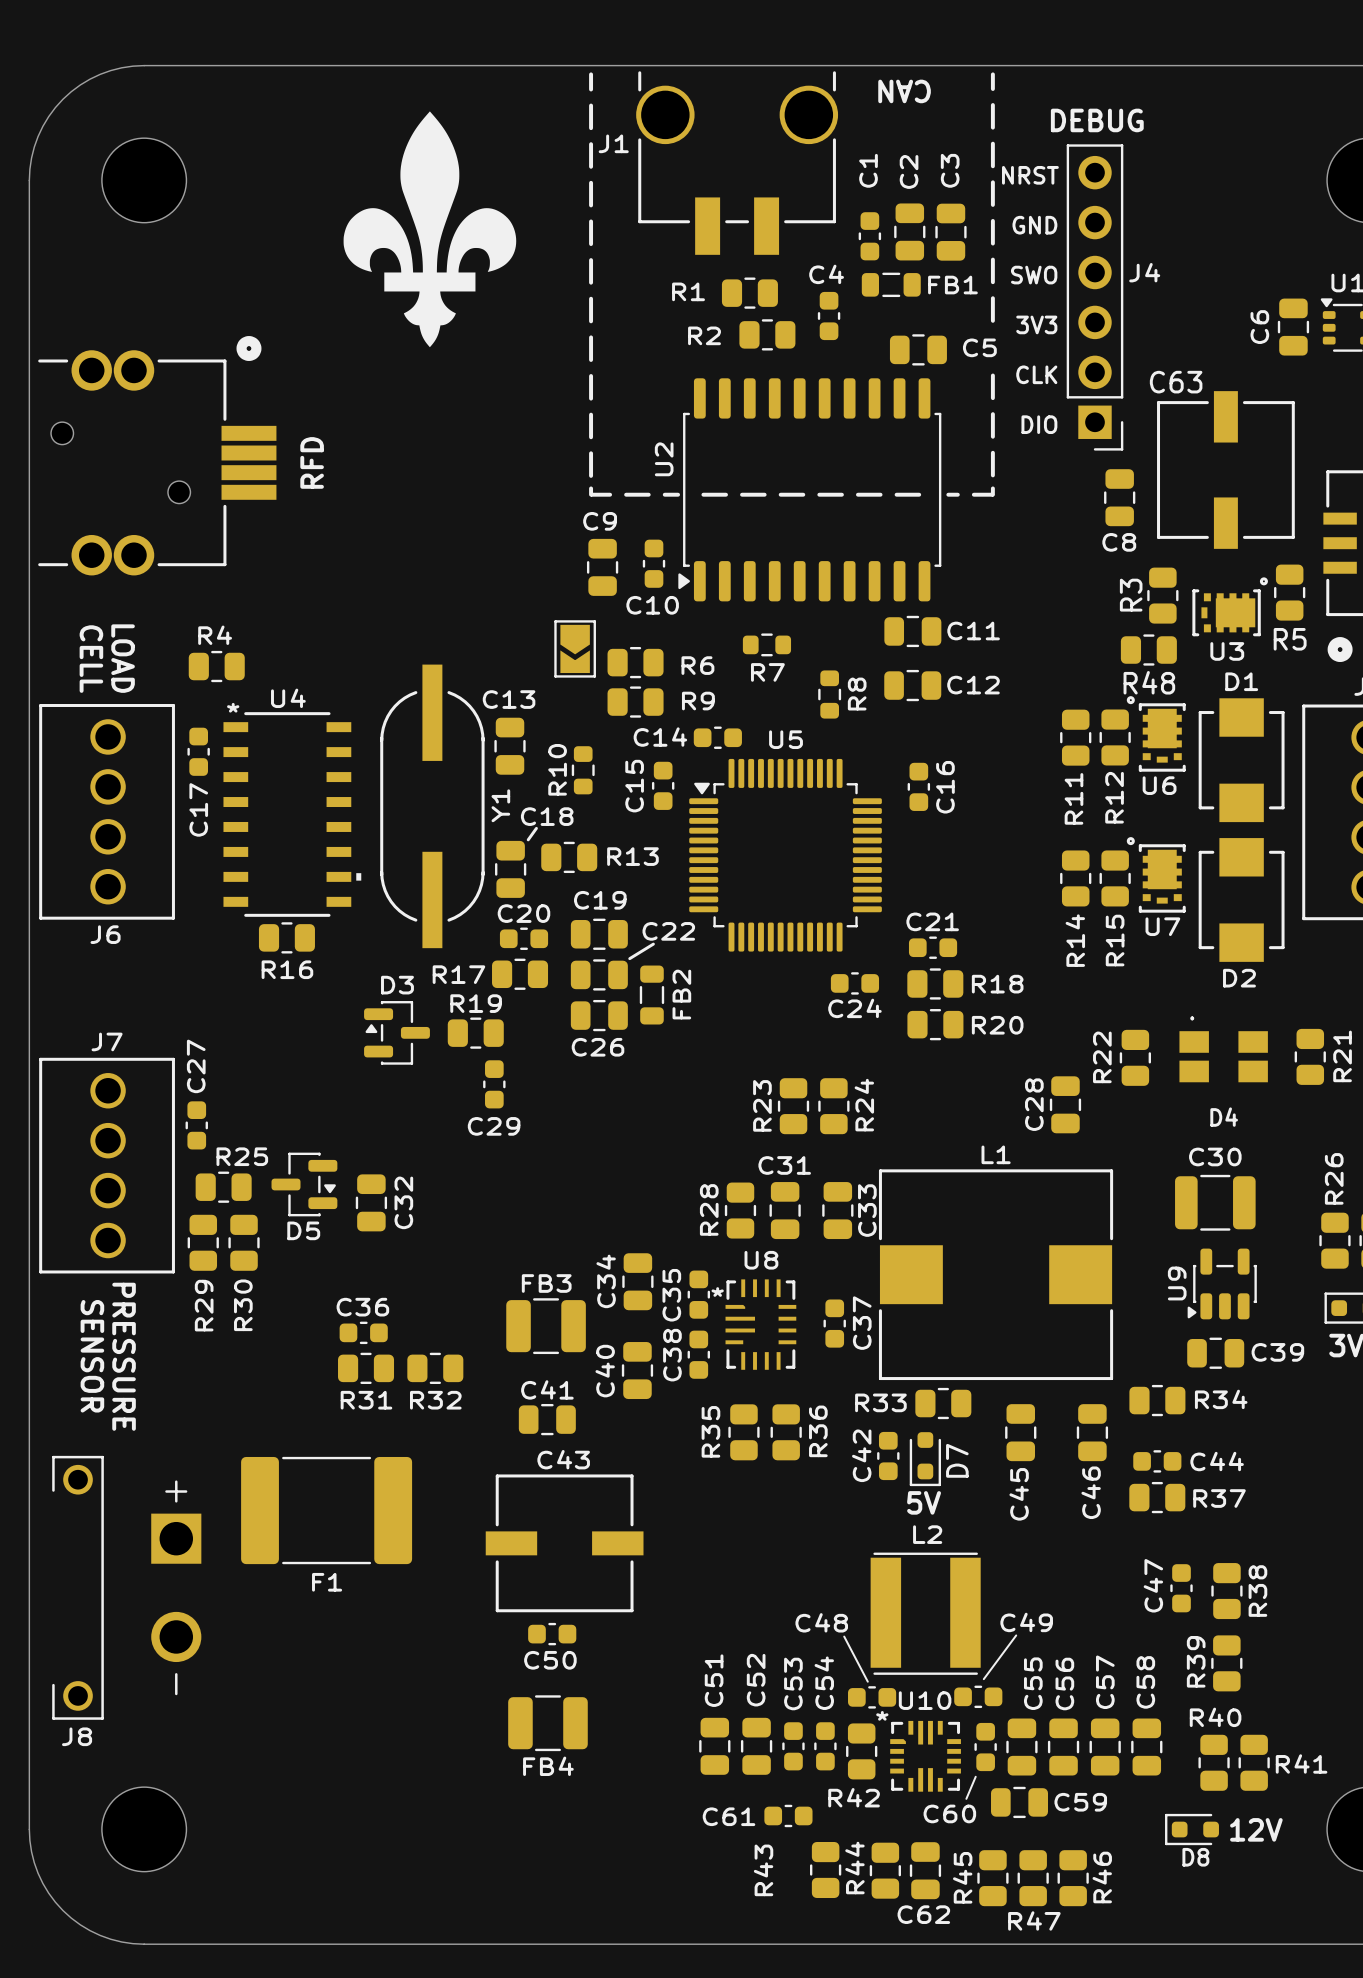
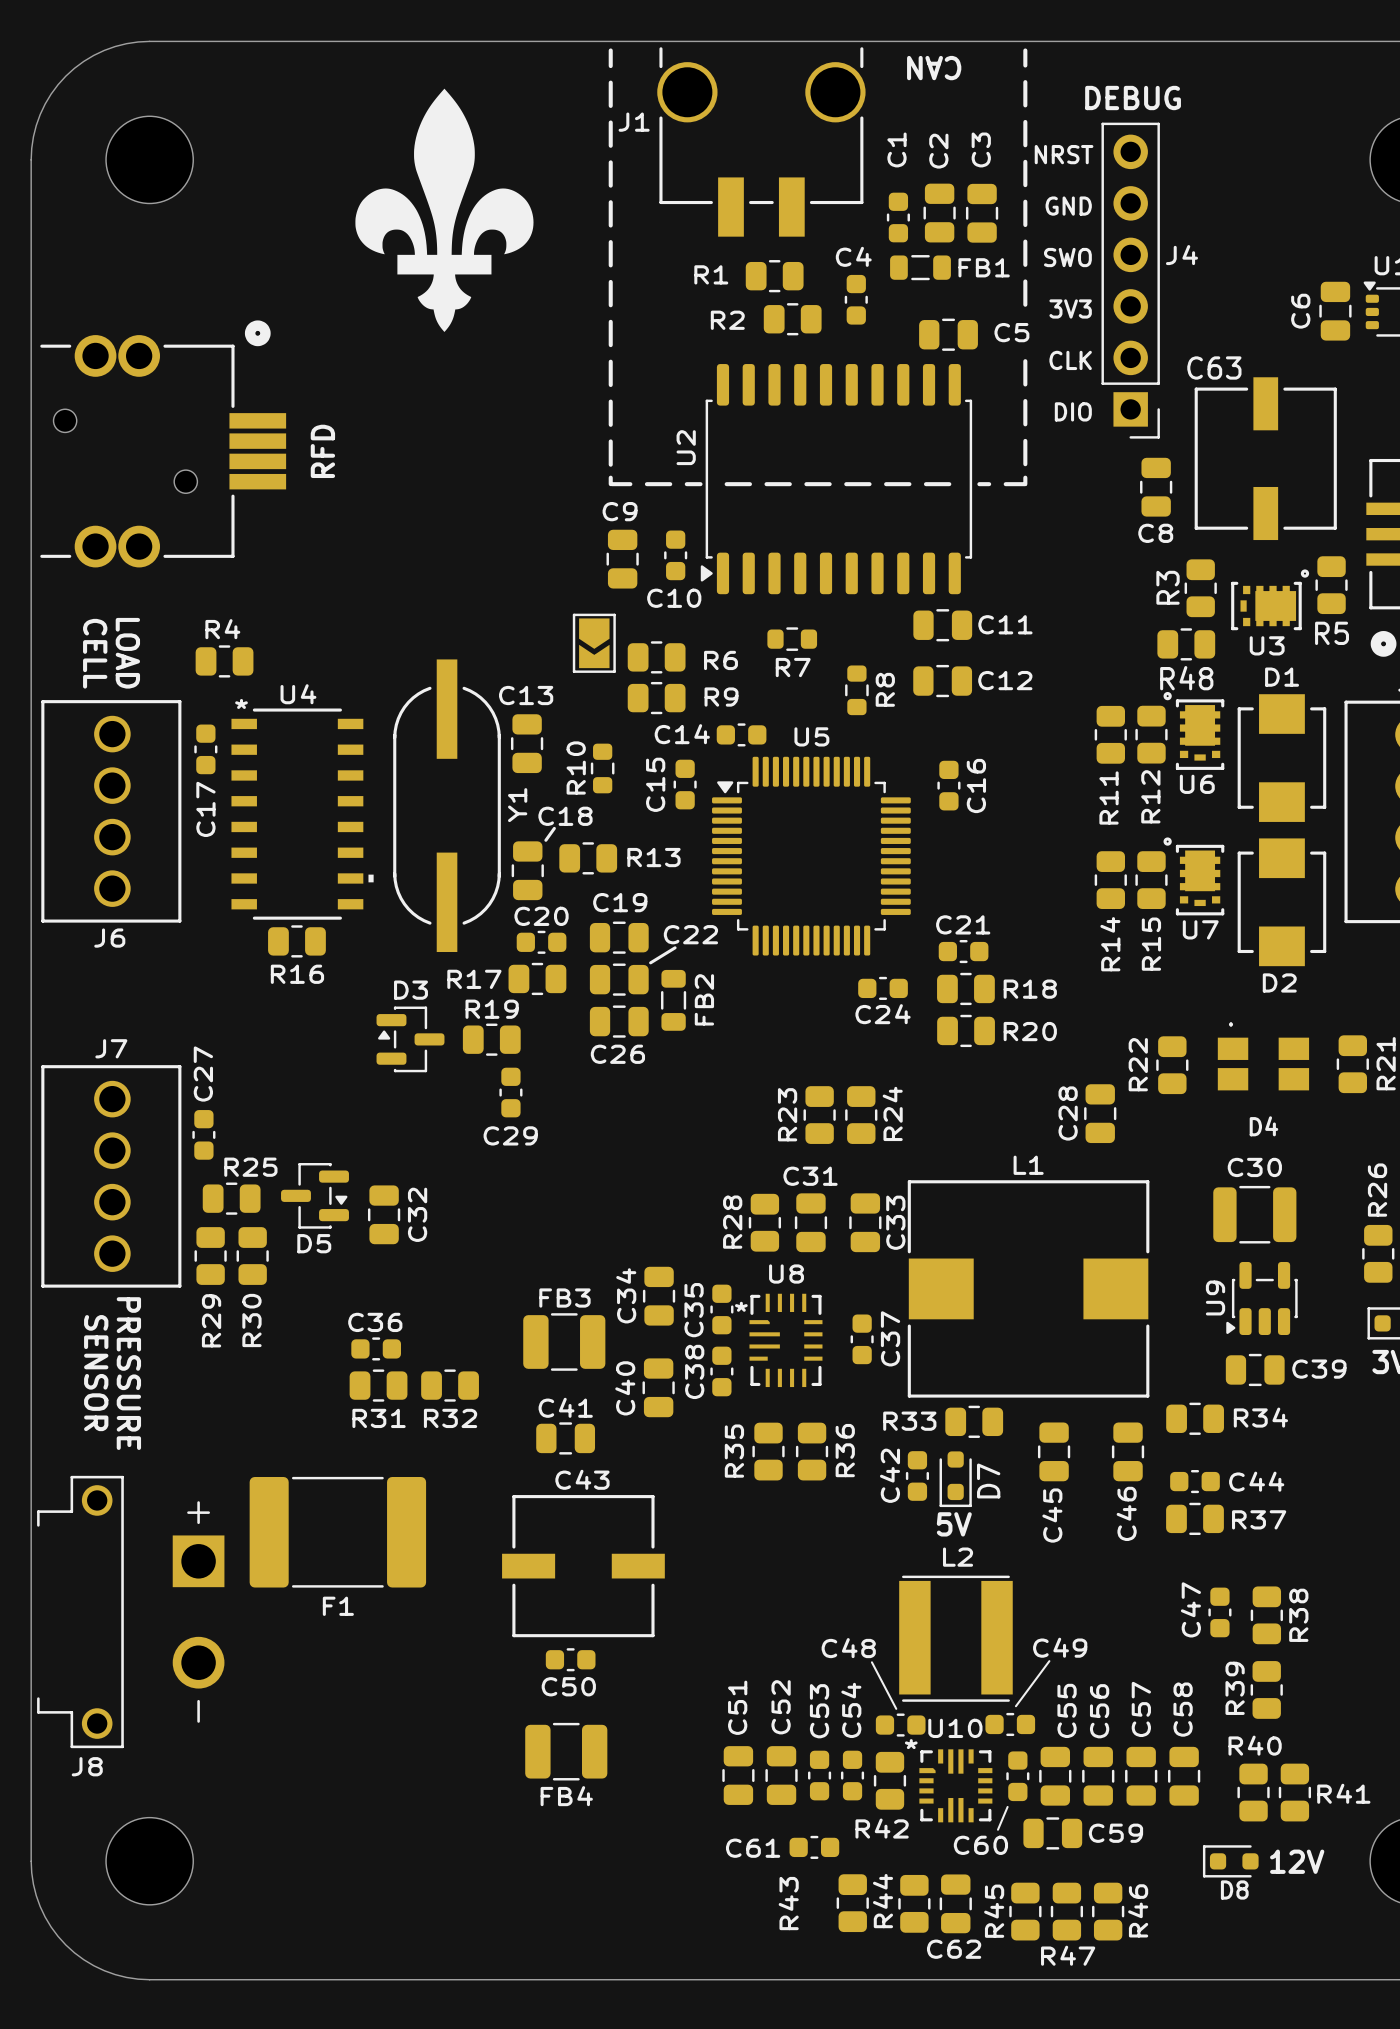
J8 footprint: [52, 1455, 202, 1720] -> [37, 1475, 225, 1749]

